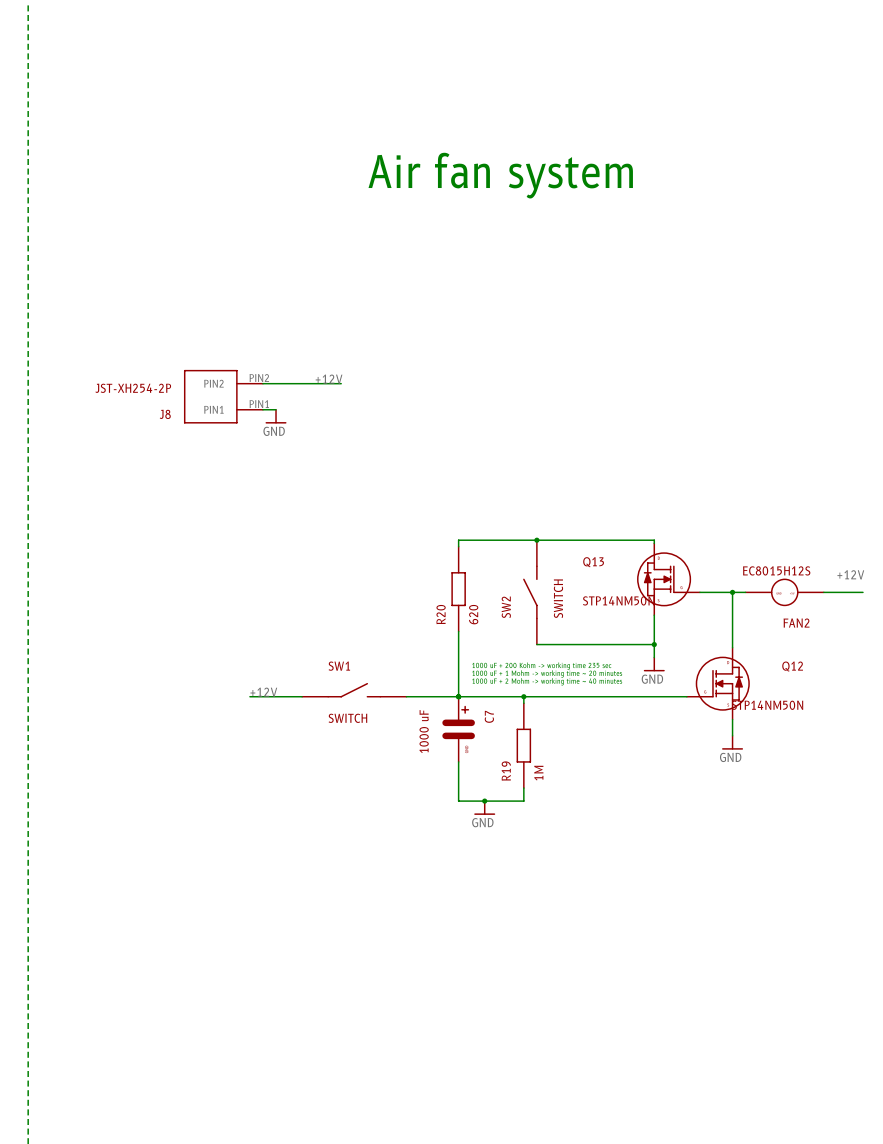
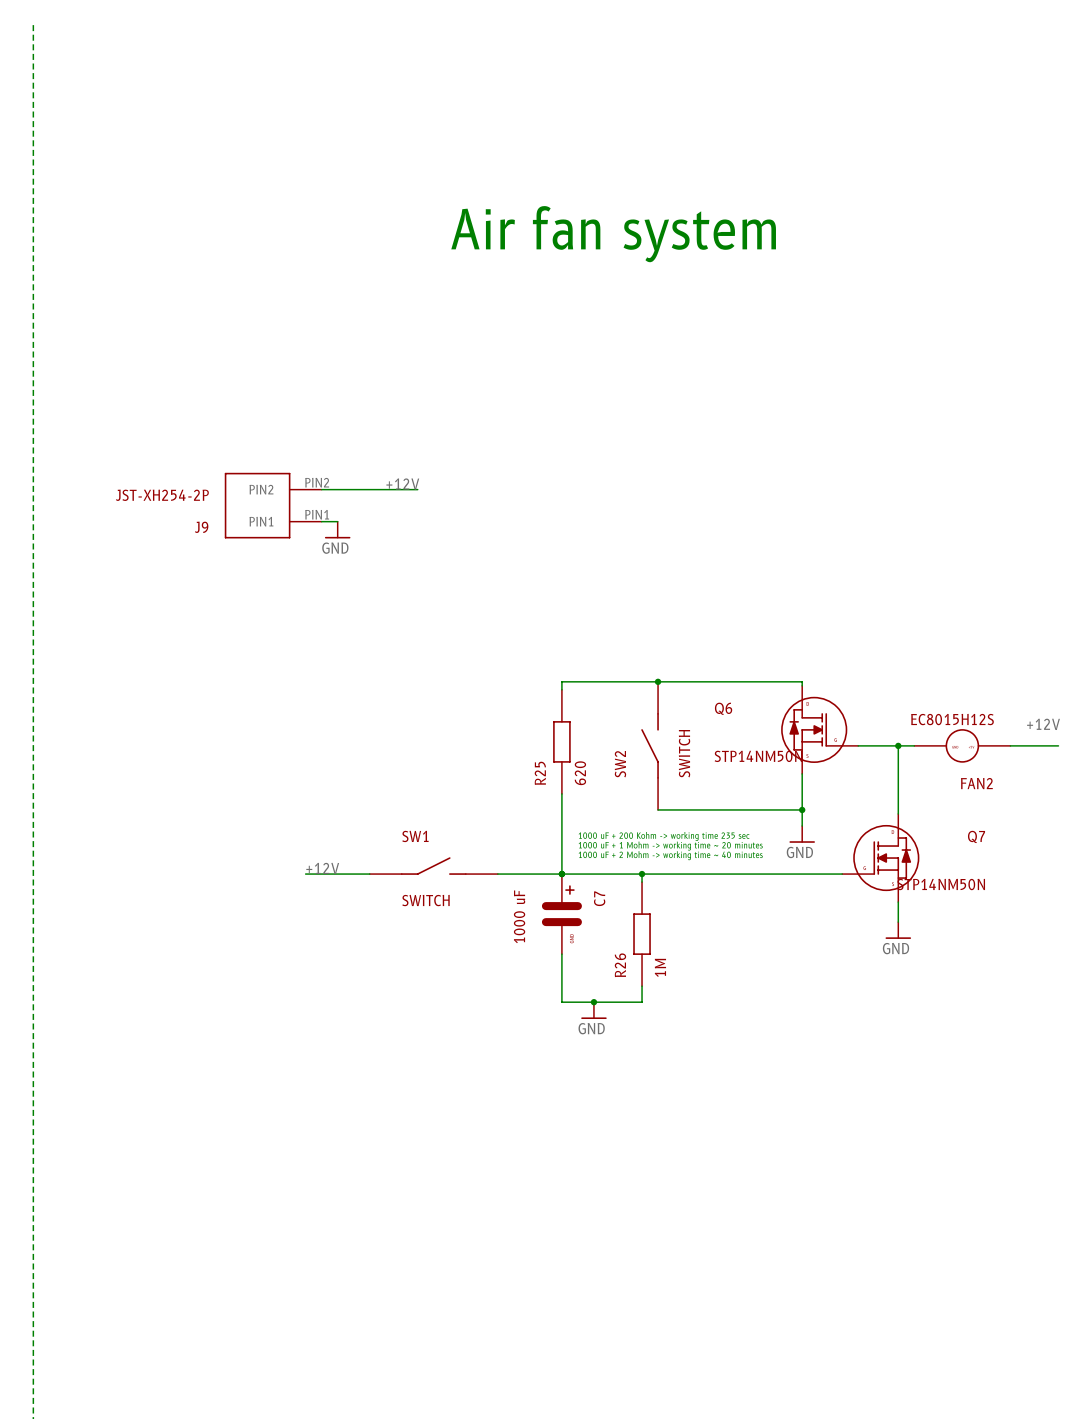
J8 name: J8 (165, 414) -> J9 (201, 527)
Q13 name: Q13 (593, 562) -> Q6 (723, 708)
R20 name: R20 (441, 614) -> R25 (540, 773)
Q12 name: Q12 (792, 666) -> Q7 (976, 836)
R19 name: R19 (506, 771) -> R26 (620, 965)

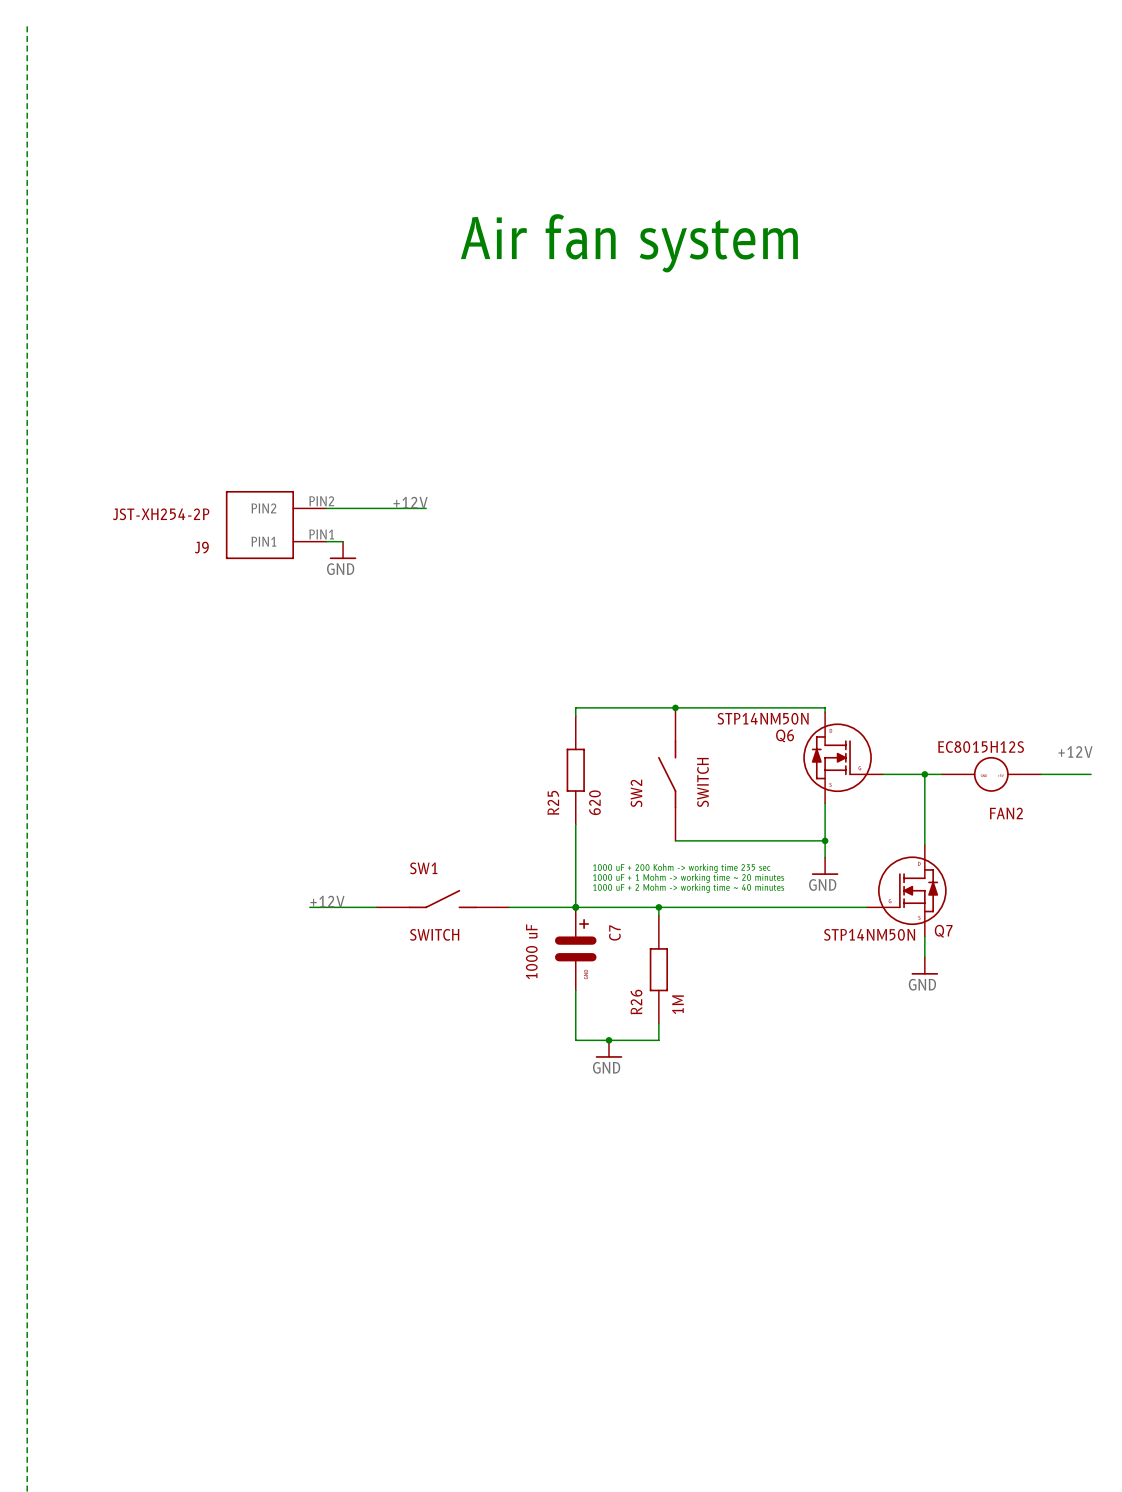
Q6 name position: Q6 (723, 708) -> Q6 (785, 735)
Q6 value position: STP14NM50N (758, 756) -> STP14NM50N (763, 718)
Q7 name position: Q7 (976, 836) -> Q7 (943, 931)
Q7 value position: STP14NM50N (941, 884) -> STP14NM50N (869, 934)

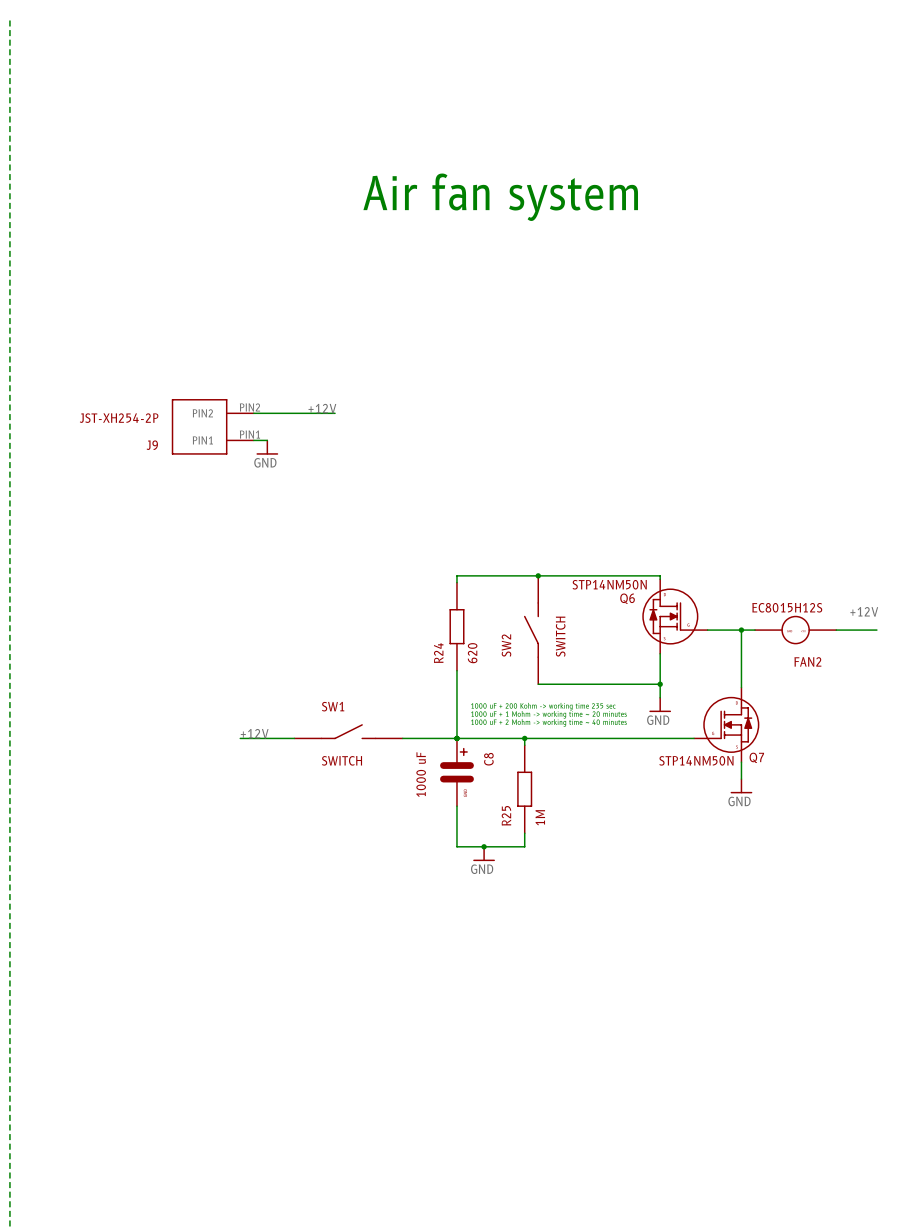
R25 name: R25 (553, 802) -> R24 (438, 653)
C7 name: C7 (614, 932) -> C8 (488, 759)
R26 name: R26 (636, 1002) -> R25 (506, 815)

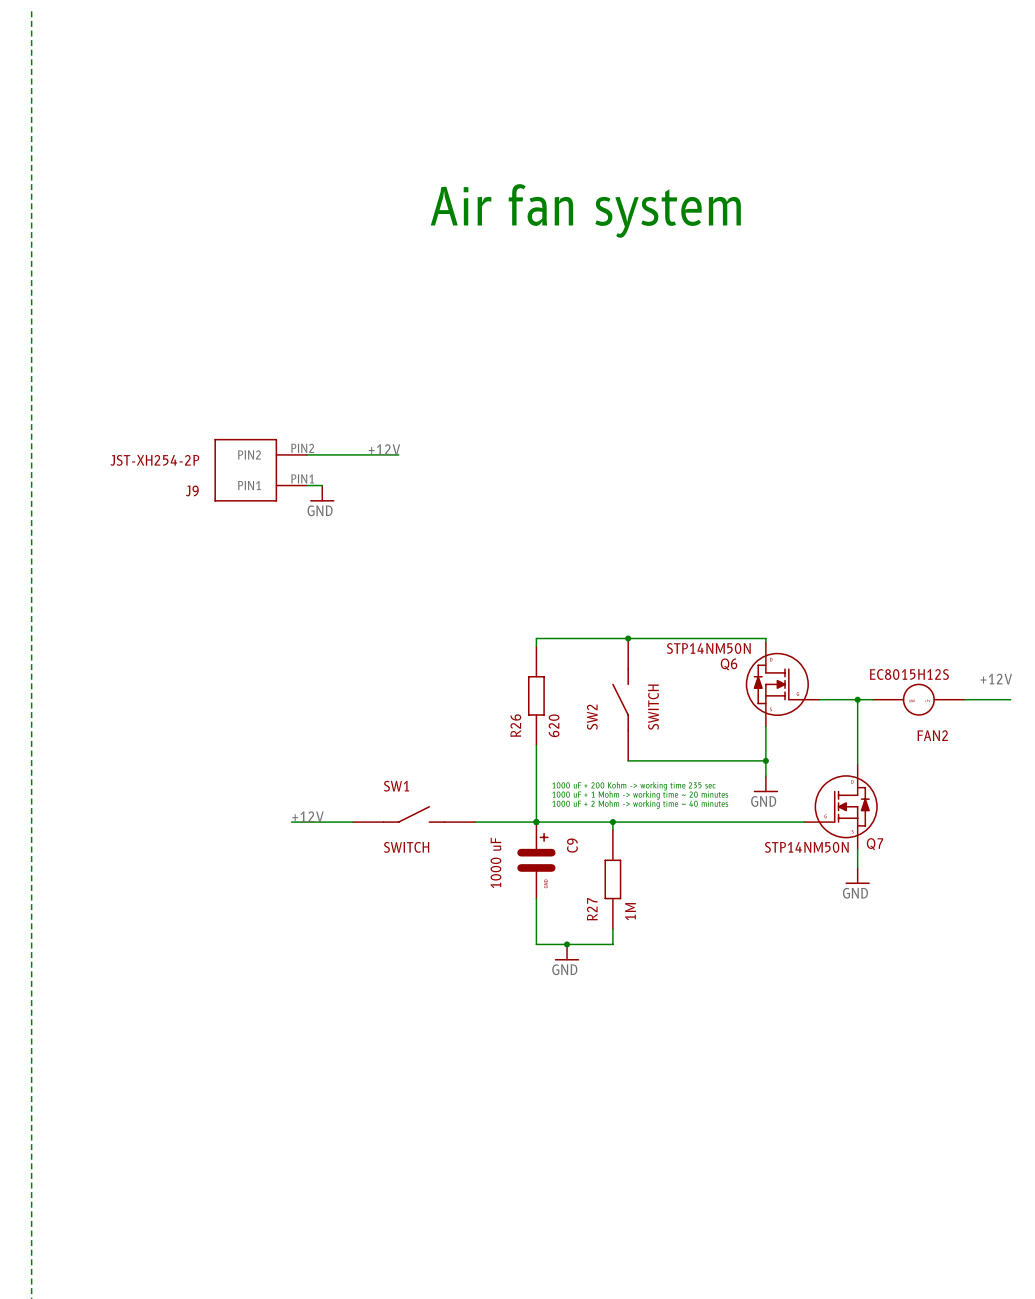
R24 name: R24 (438, 653) -> R26 (515, 725)
C8 name: C8 (488, 759) -> C9 (572, 845)
R25 name: R25 (506, 815) -> R27 (592, 909)

